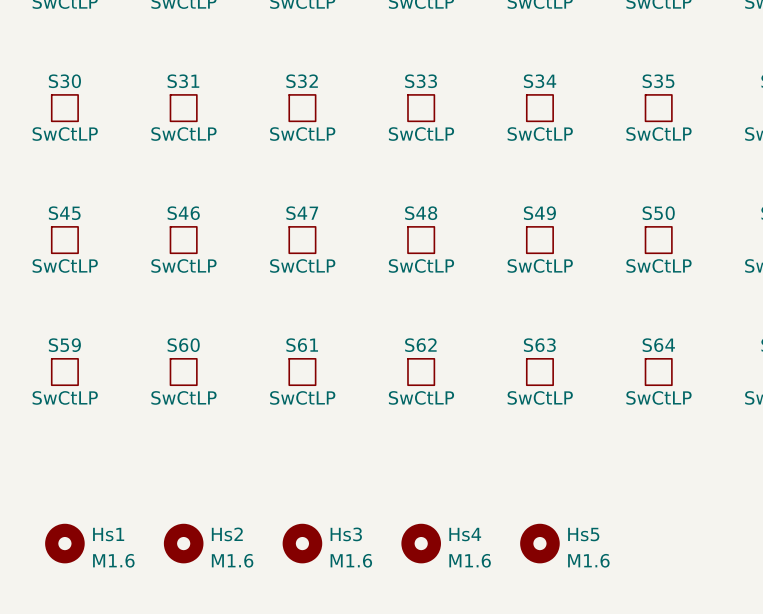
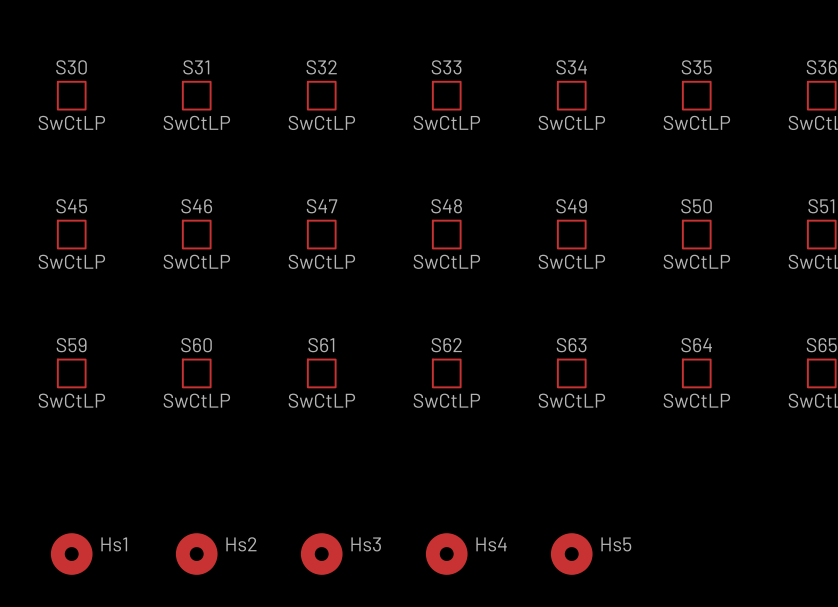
Hs1 value: M1.6 (113, 560) -> none
Hs2 value: M1.6 (232, 560) -> none
Hs3 value: M1.6 (351, 560) -> none
Hs4 value: M1.6 (470, 560) -> none
Hs5 value: M1.6 (588, 560) -> none

